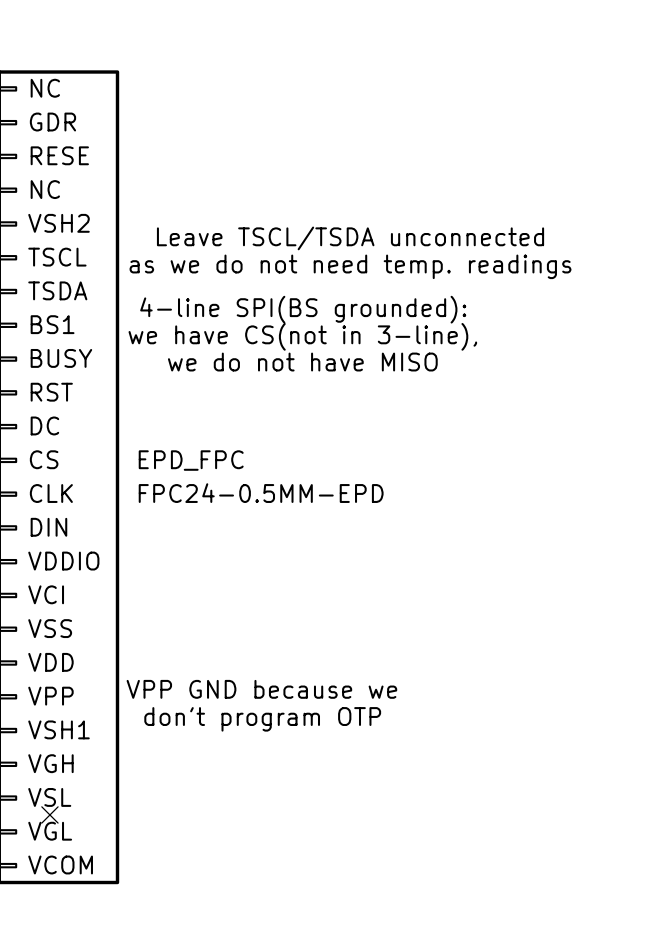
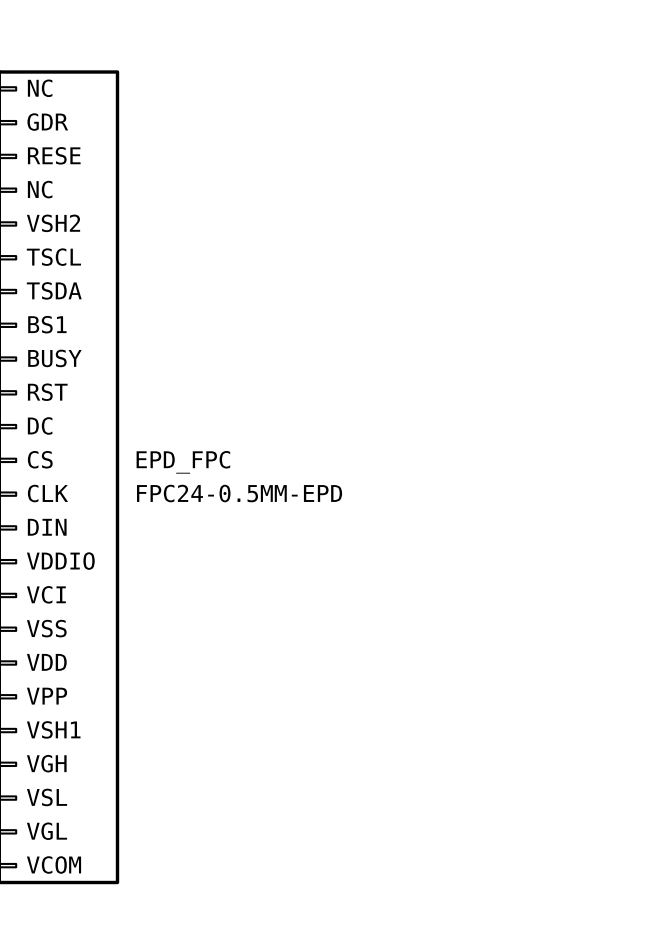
text: Leave TSCL/TSDA unconnected (350, 238) -> none
text: as we do not need temp. readings (350, 266) -> none
text: 4-line SPI(BS grounded): (303, 309) -> none
text: we have CS(not in 3-line), (302, 336) -> none
text: we do not have MISO (302, 362) -> none
text: VPP GND because we (261, 689) -> none
text: don't program OTP (262, 719) -> none
no-connect mark: (49, 814) -> none

